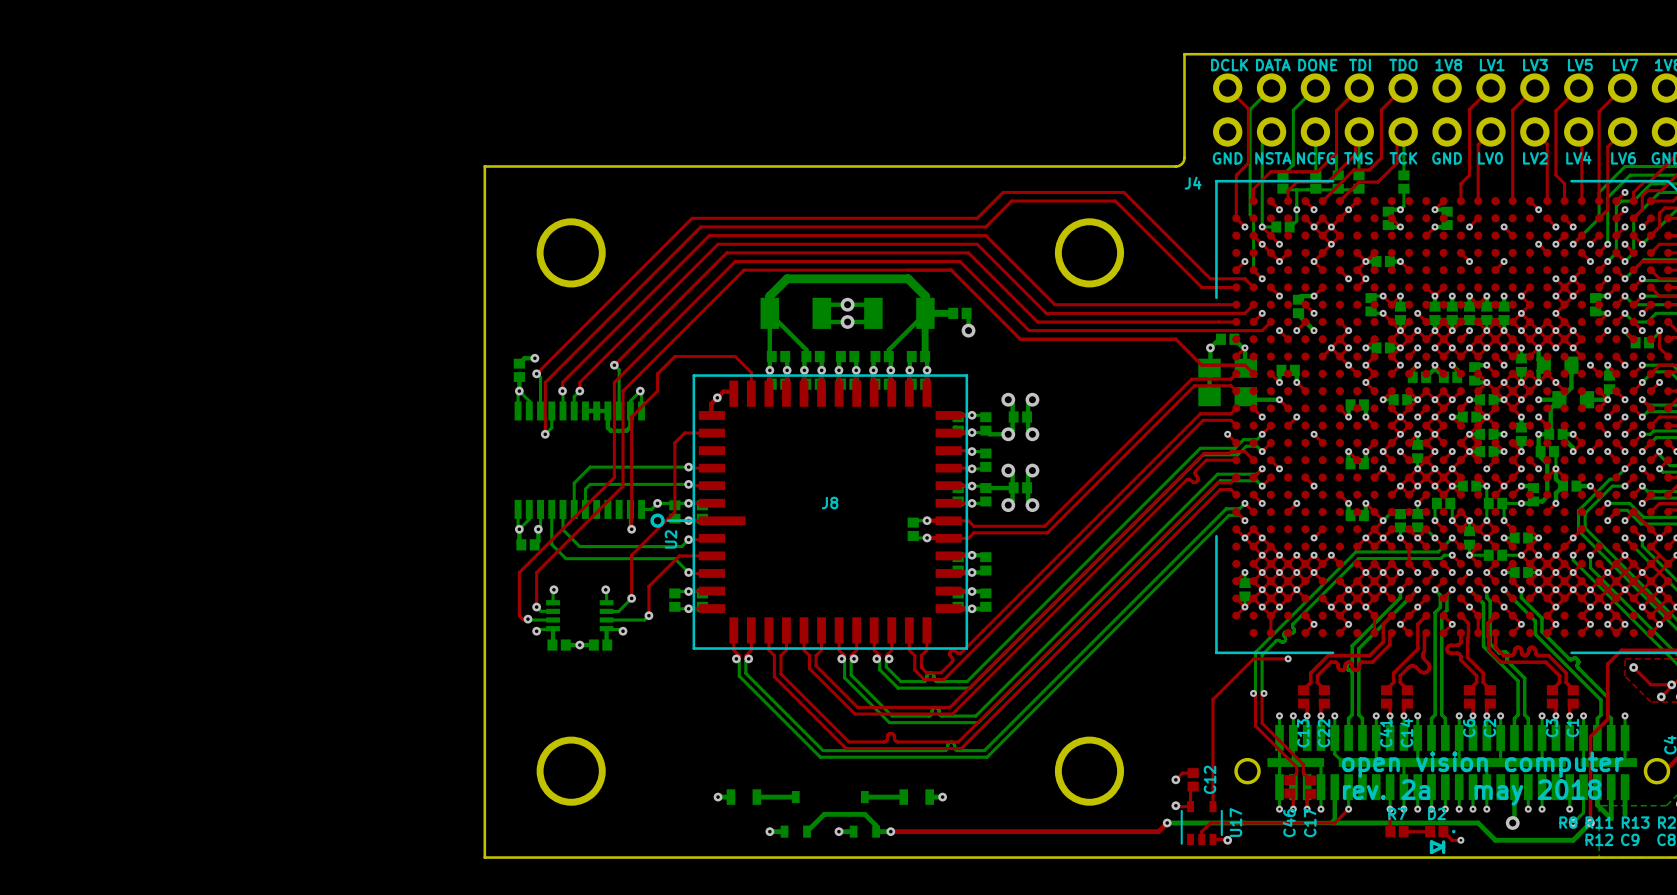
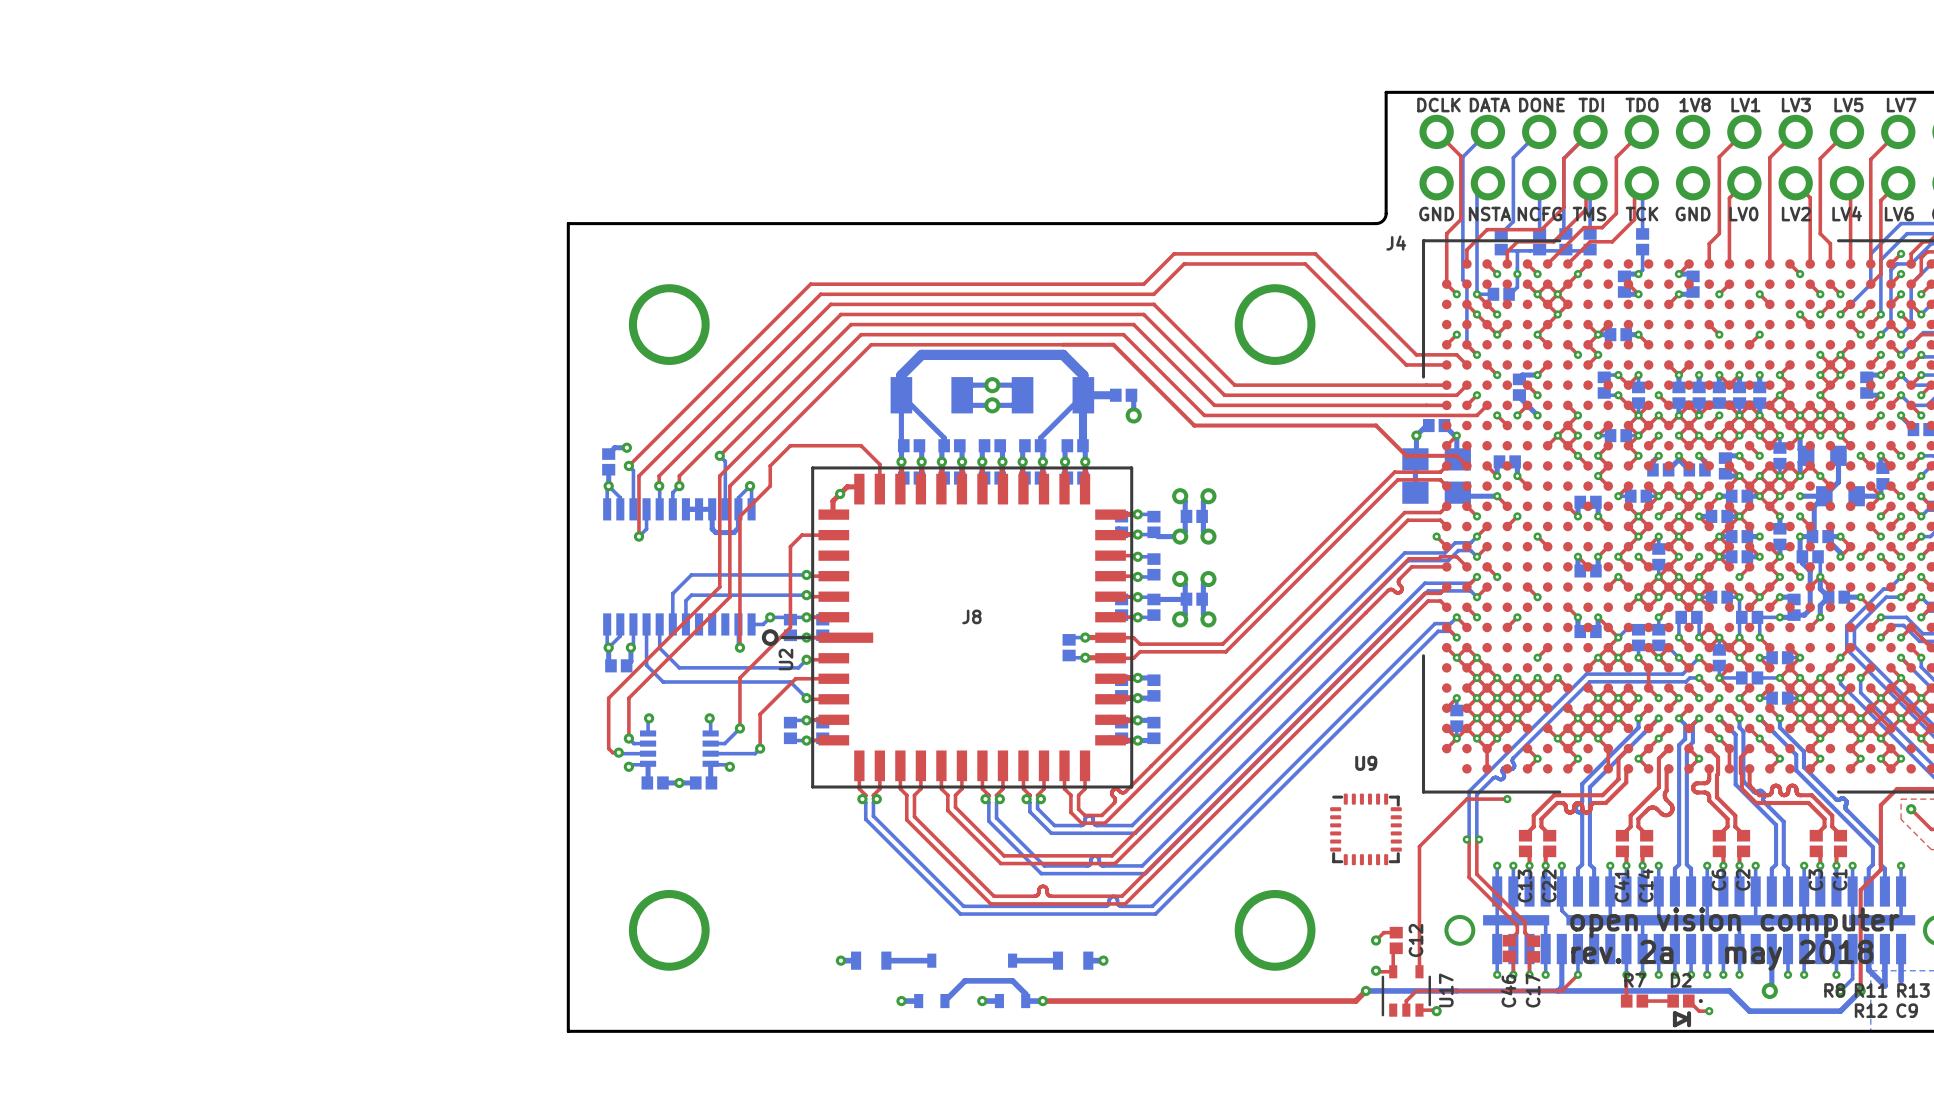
U9: none -> (1365, 829)

